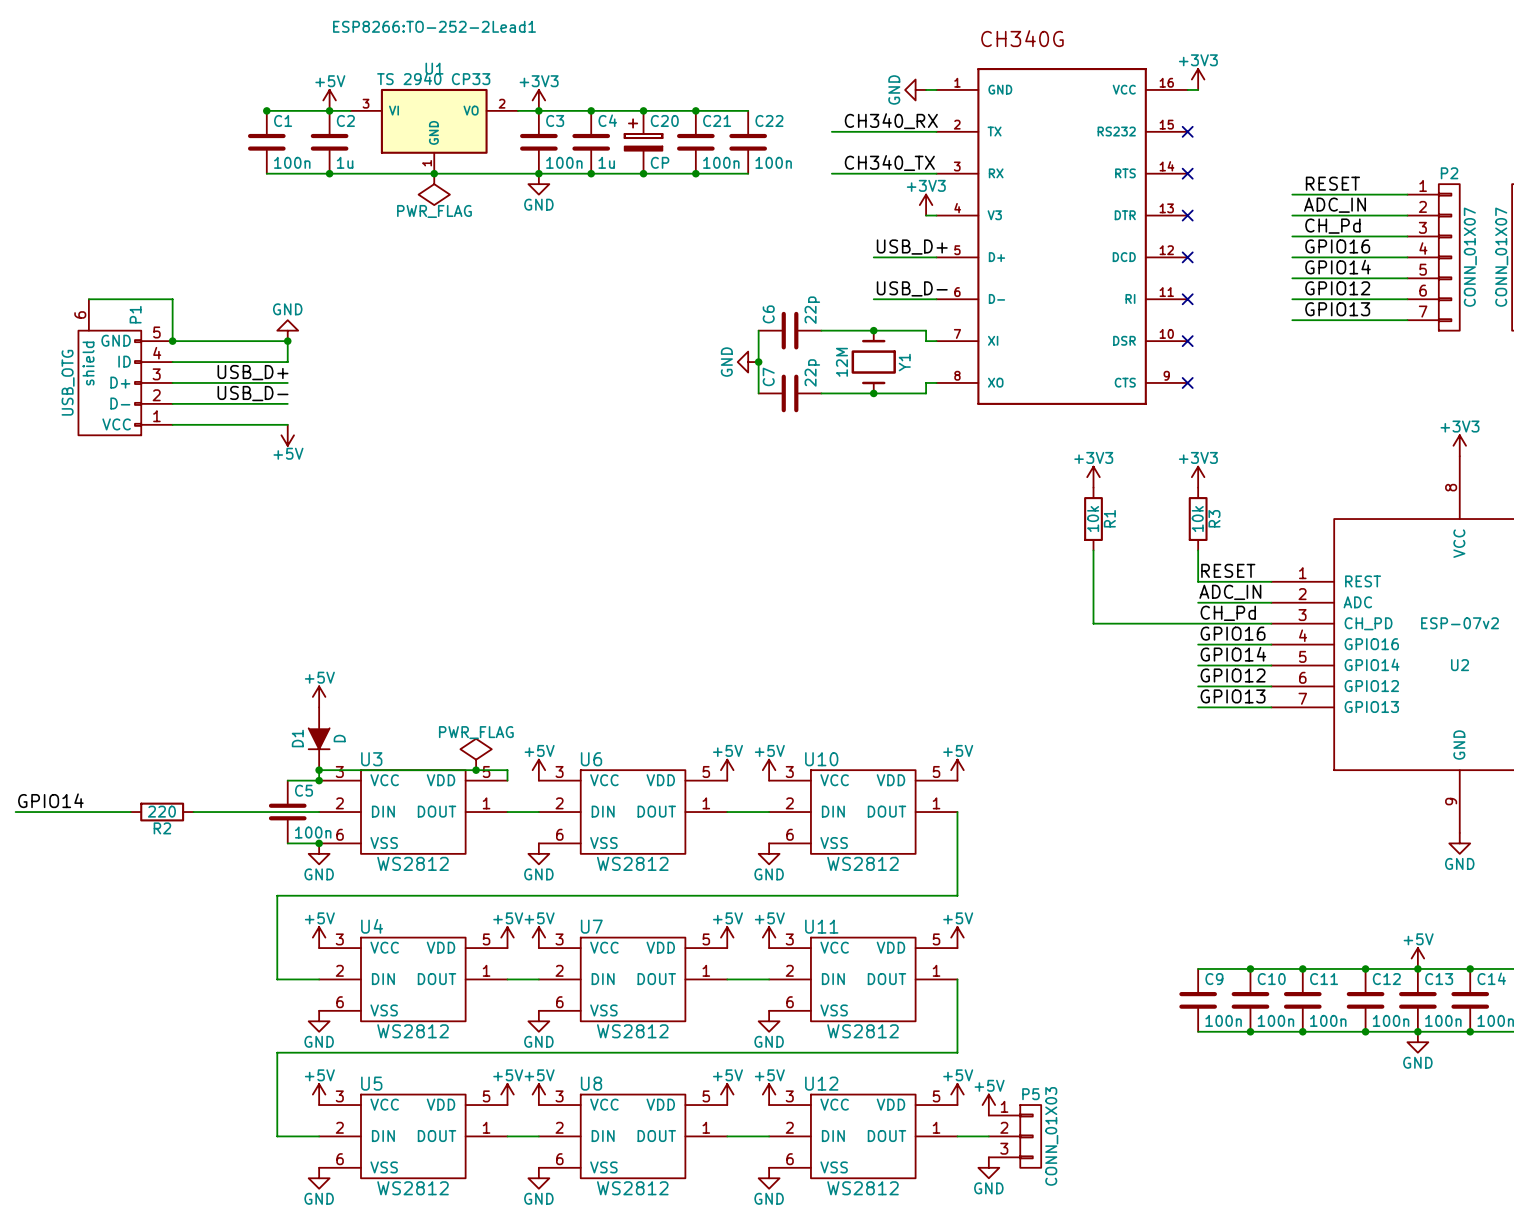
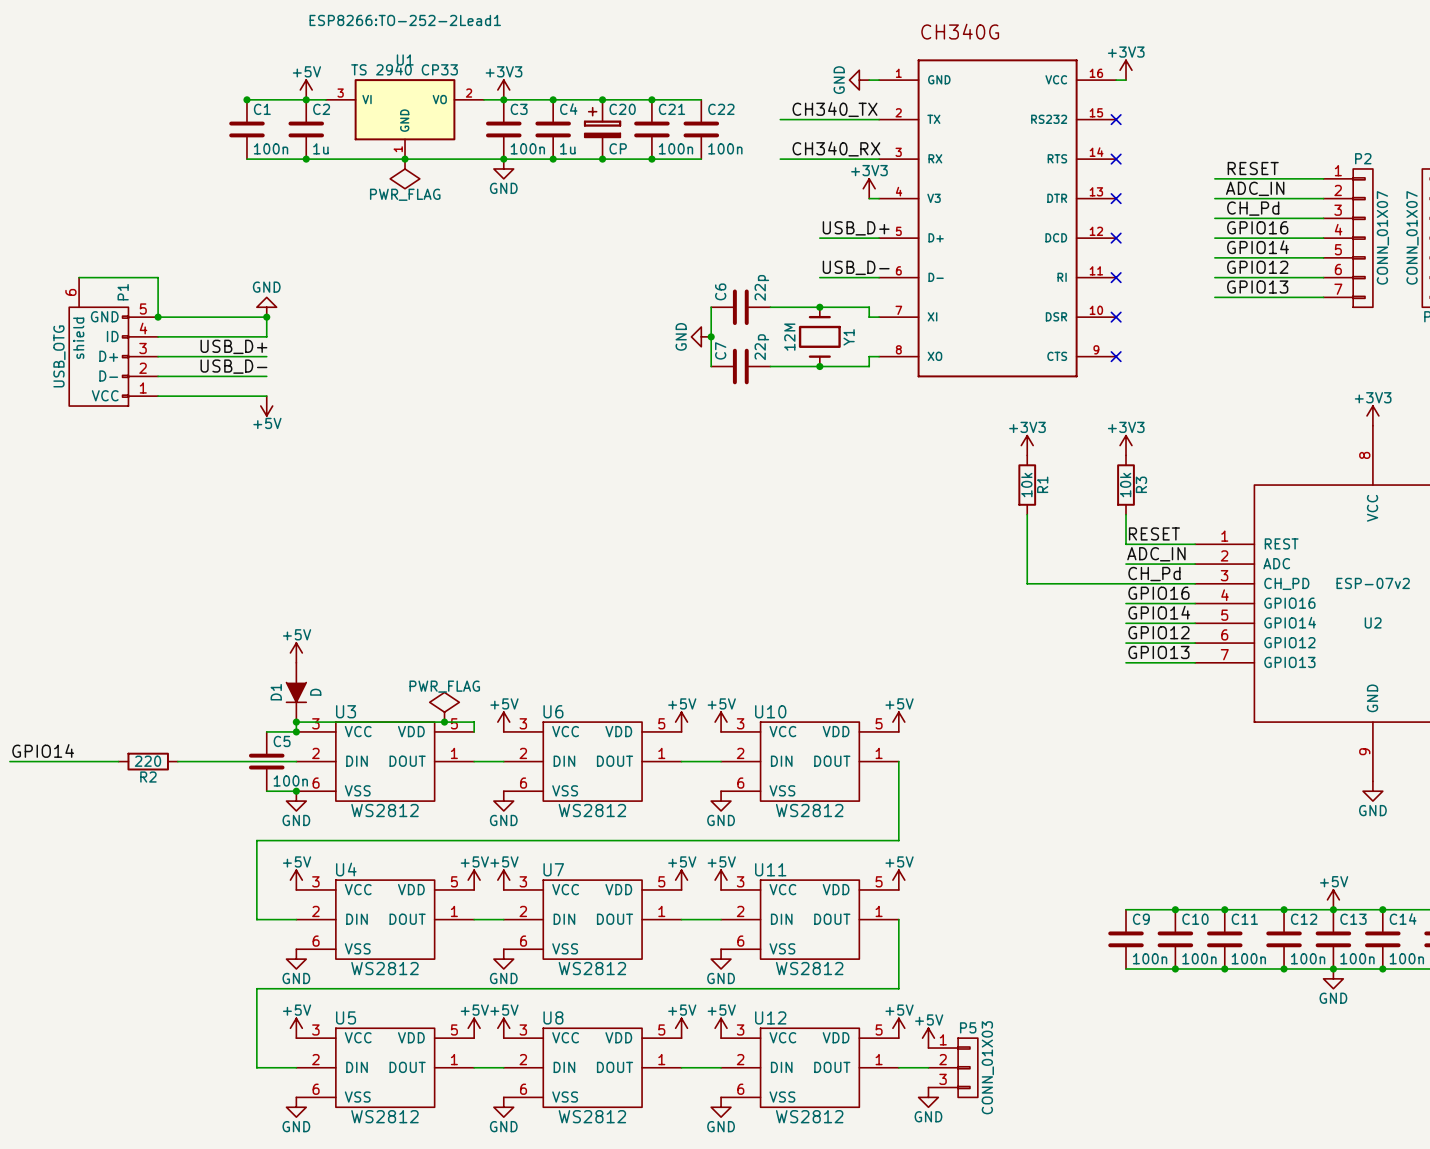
label: CH340_RX (891, 121) -> CH340_TX (835, 109)
label: CH340_TX (889, 163) -> CH340_RX (836, 149)

